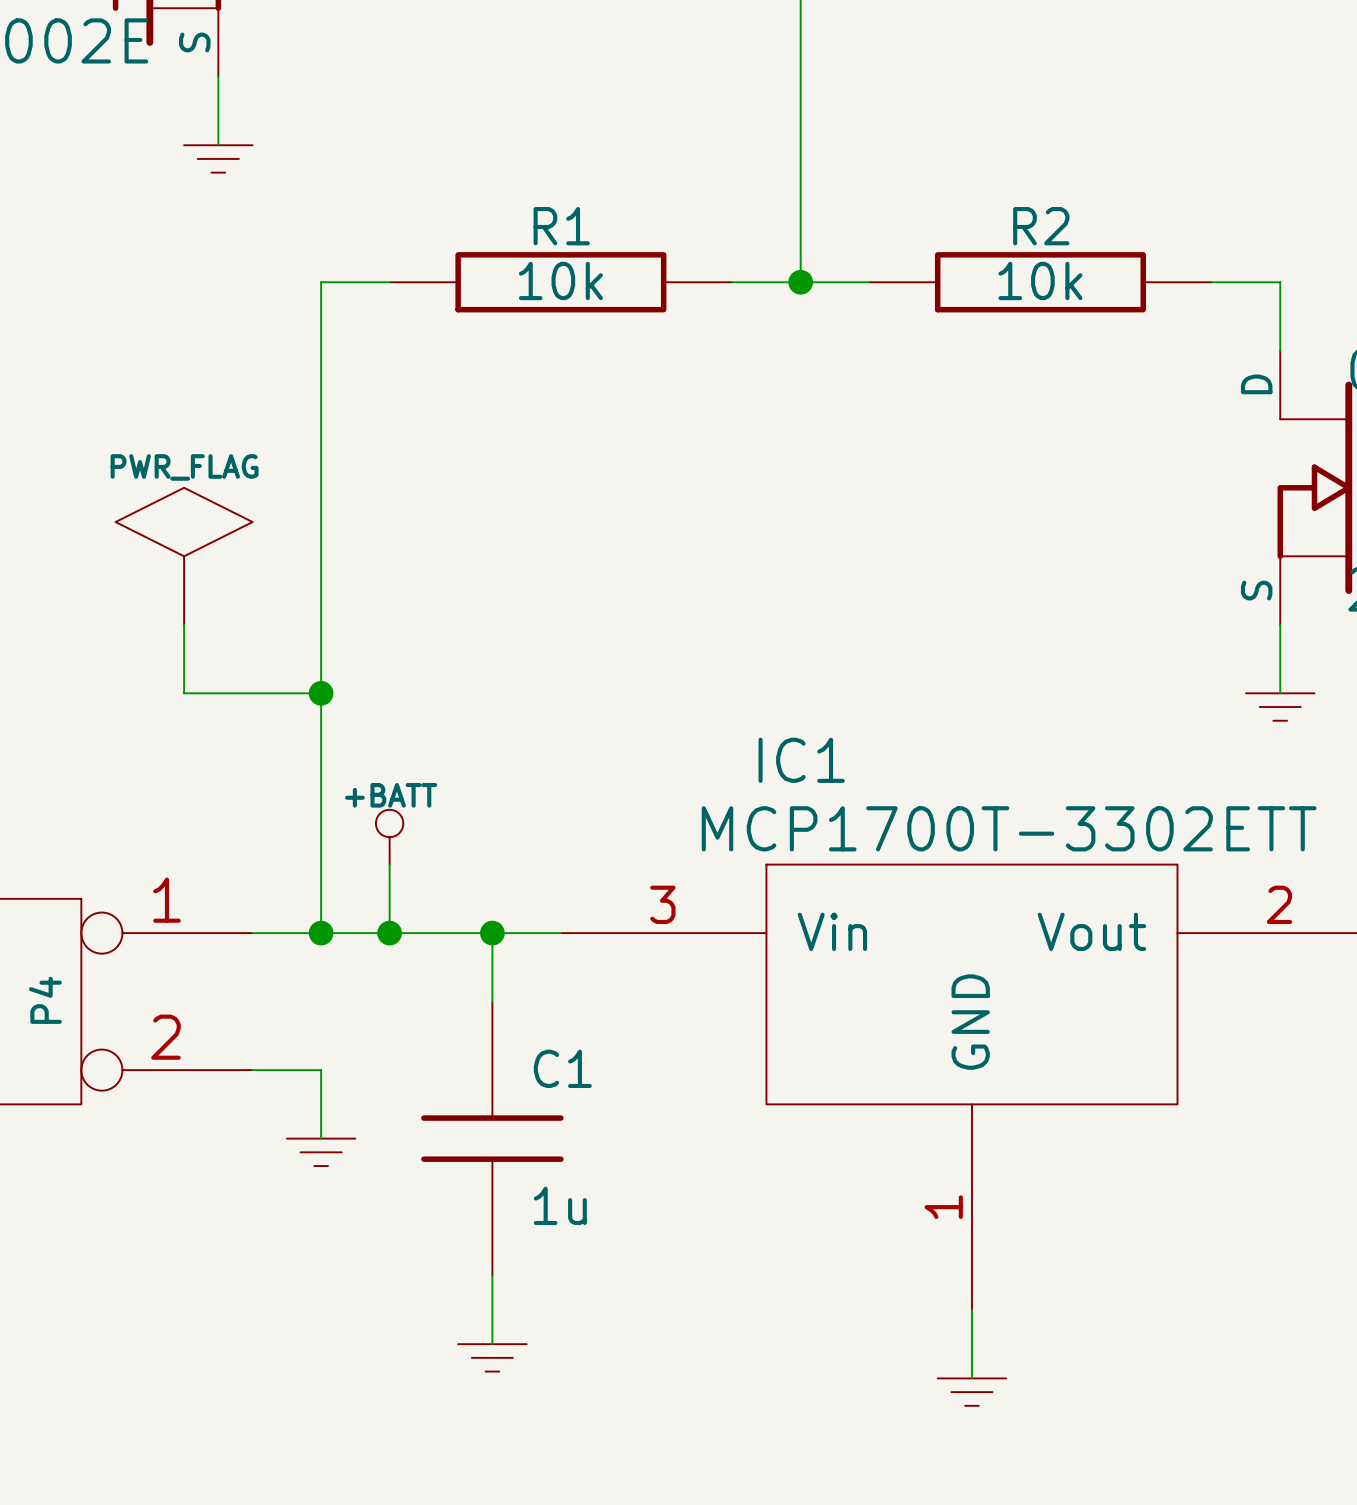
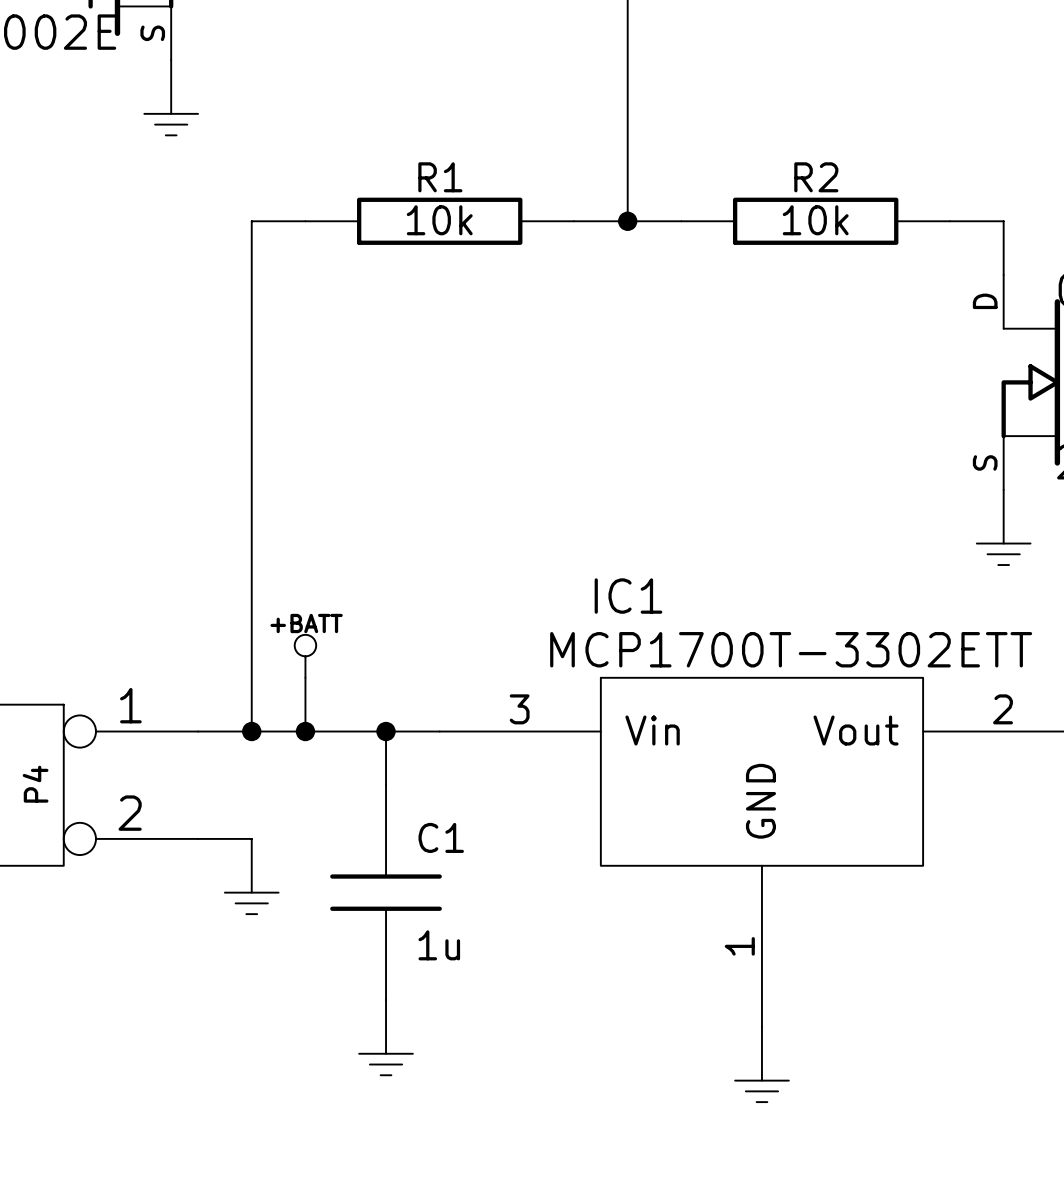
power symbol: PWR_FLAG (184, 556) -> none
wire: (184, 624) (184, 693) (321, 693) -> none
junction: (321, 693) -> none

